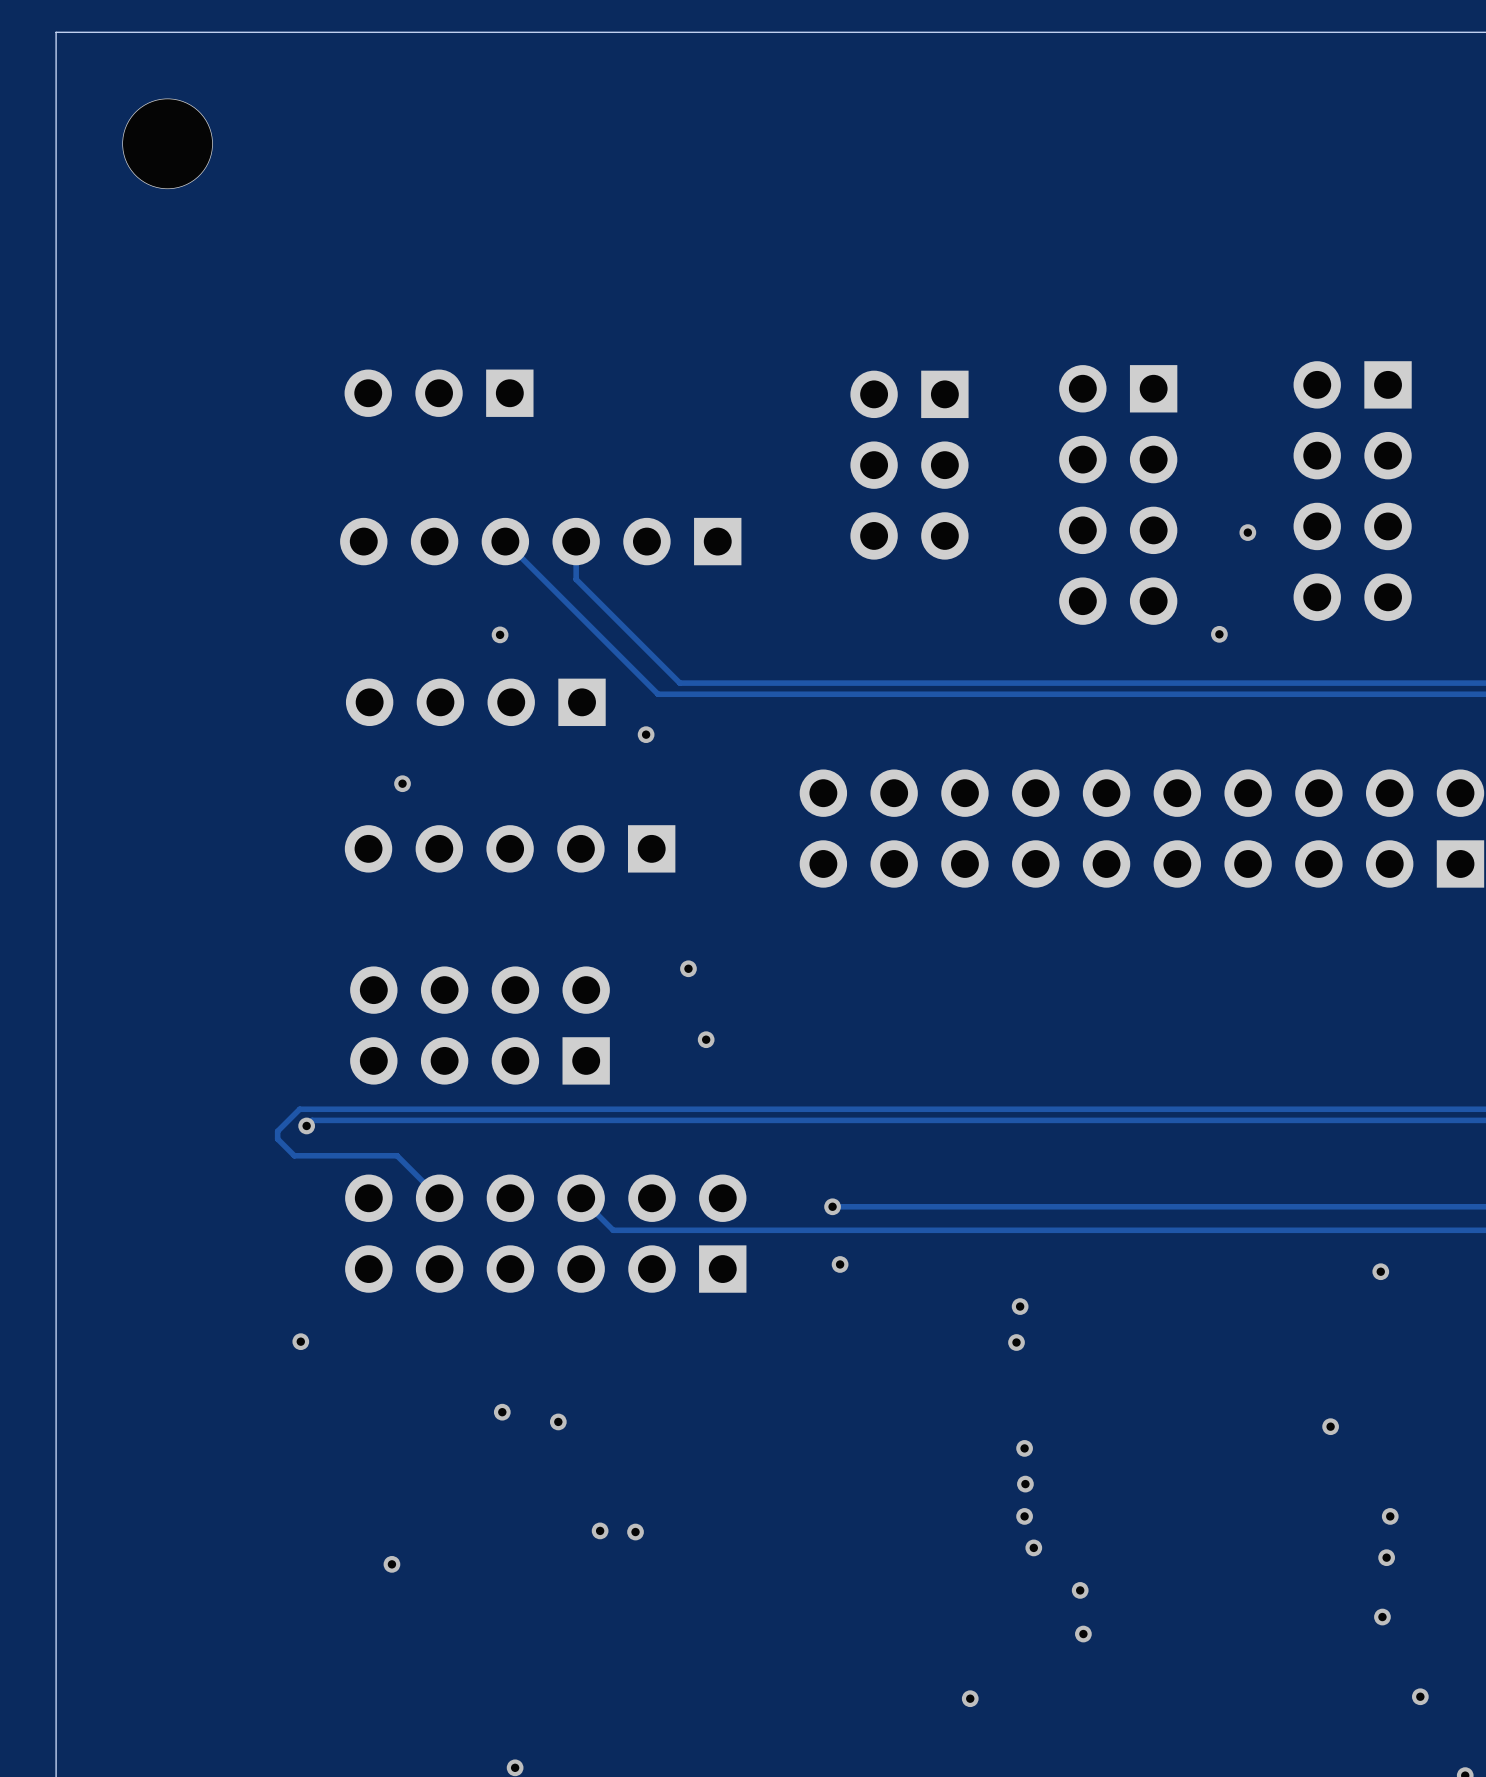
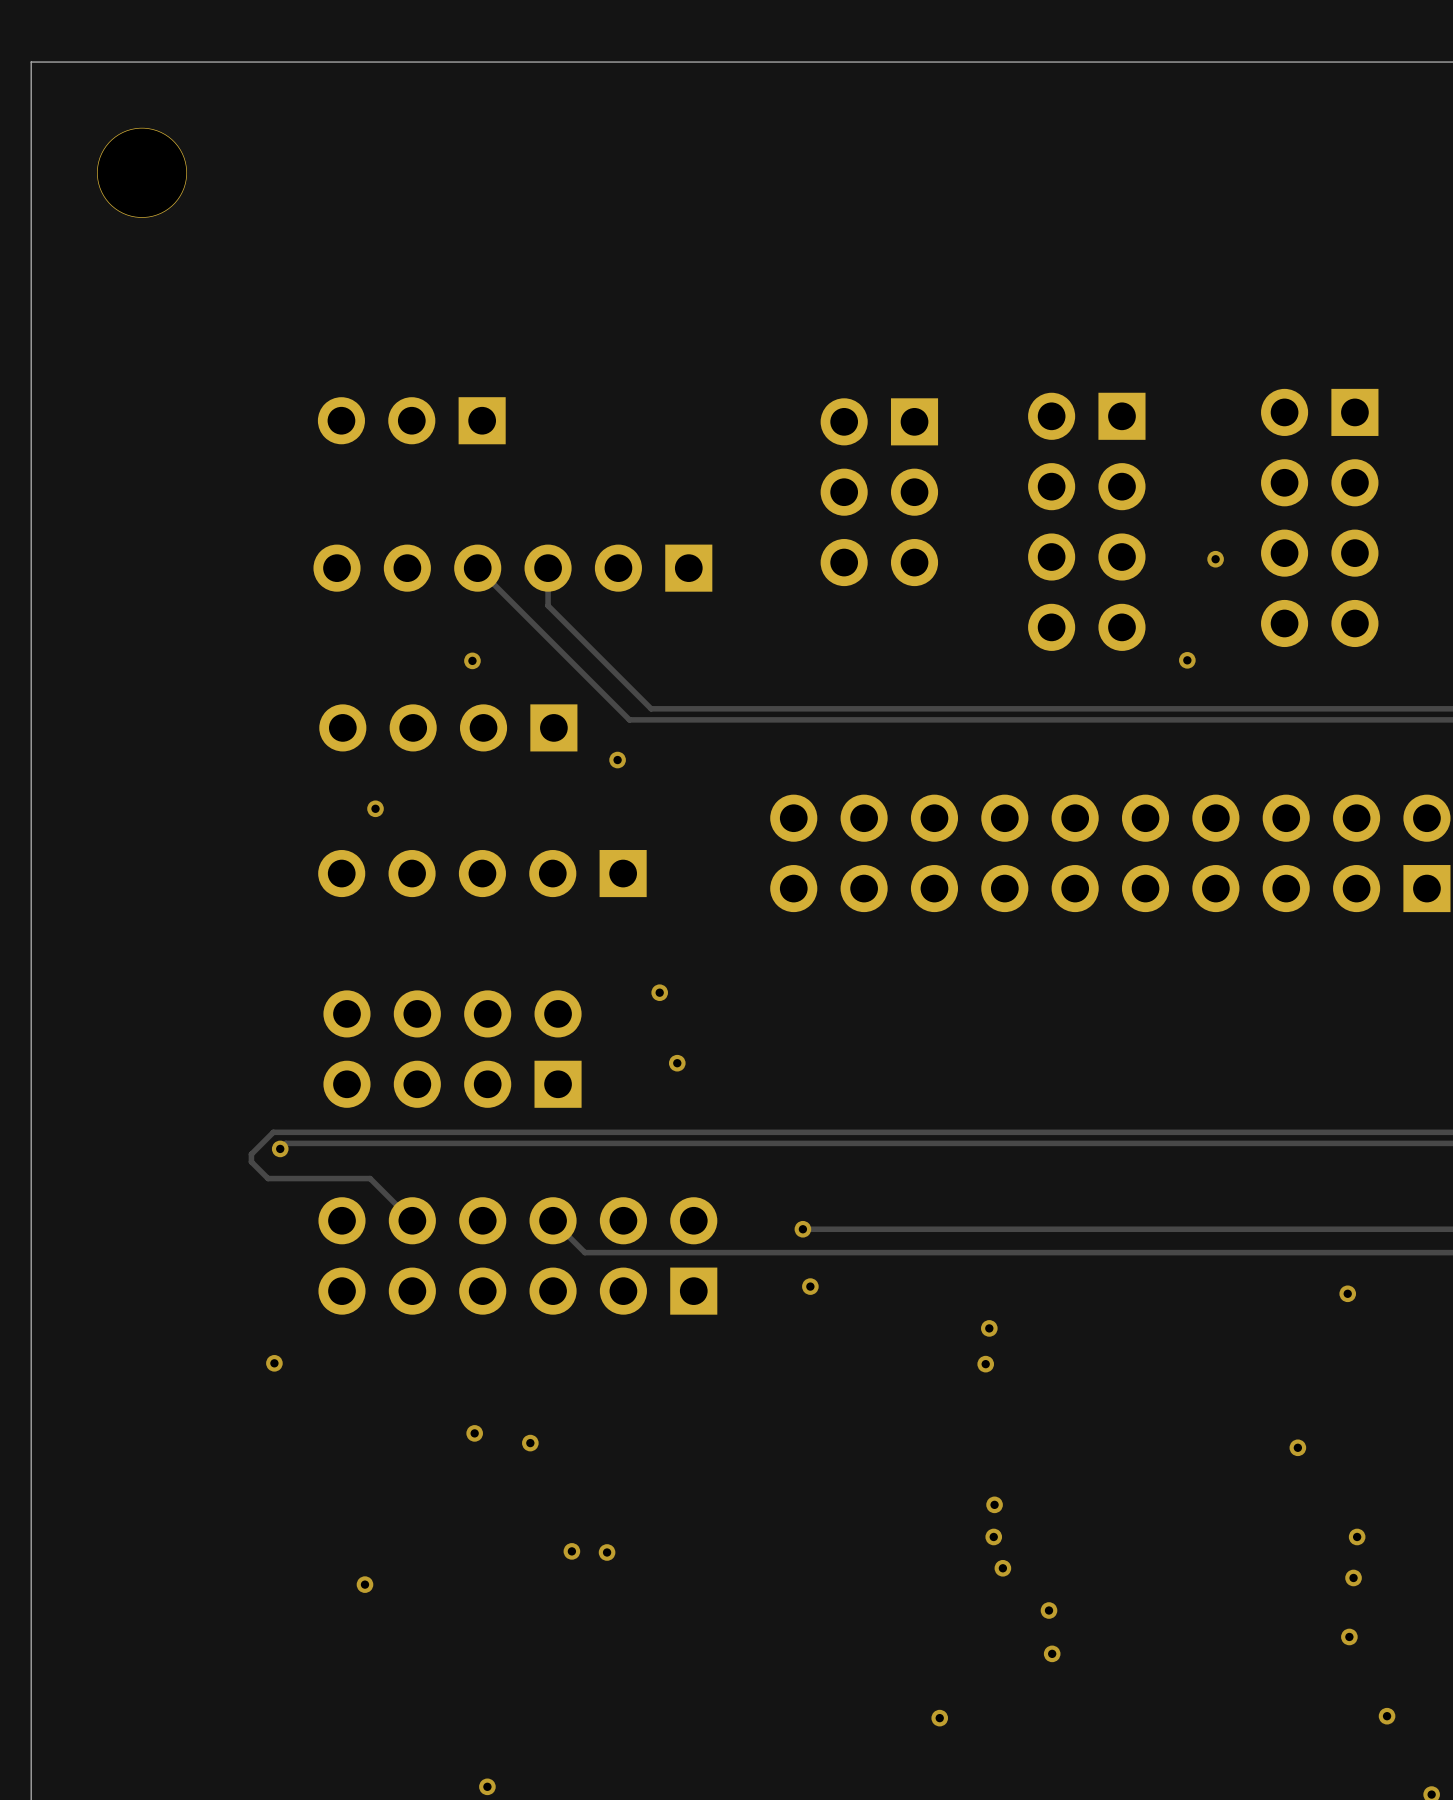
via: (1024, 1448) -> none

